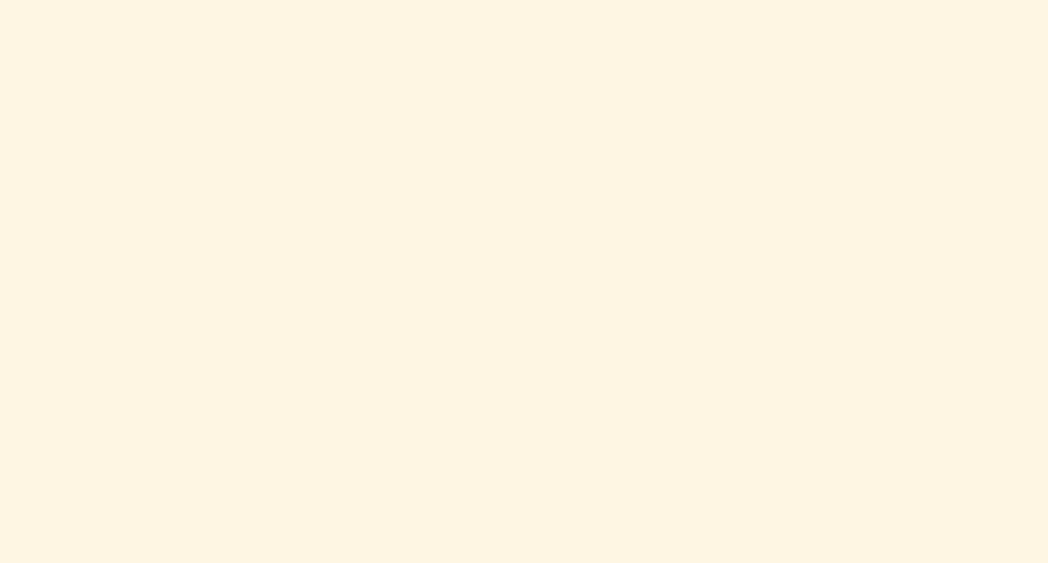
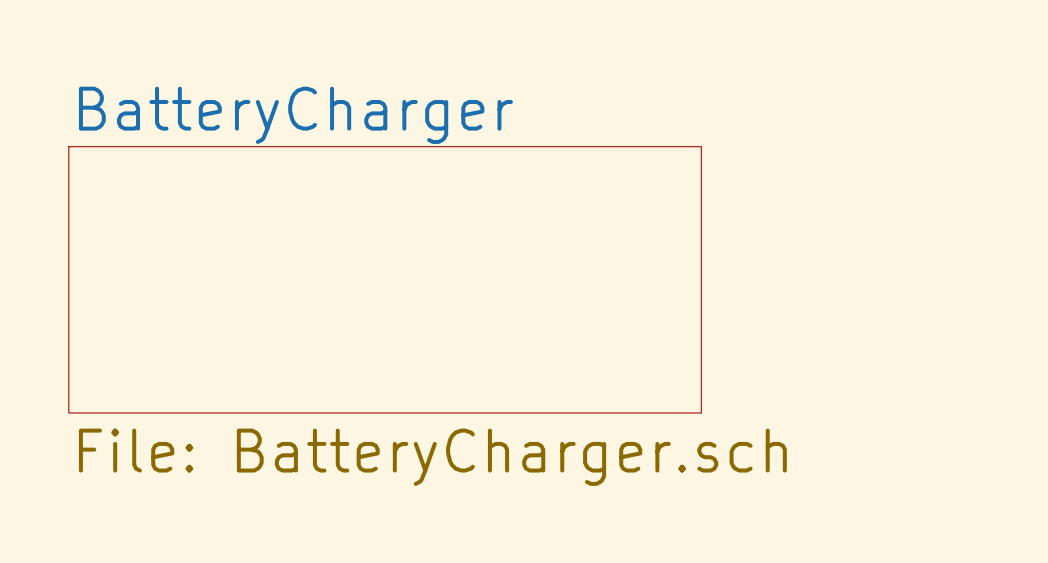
sheet BatteryCharger: none -> File: BatteryCharger.sch (385, 279)

